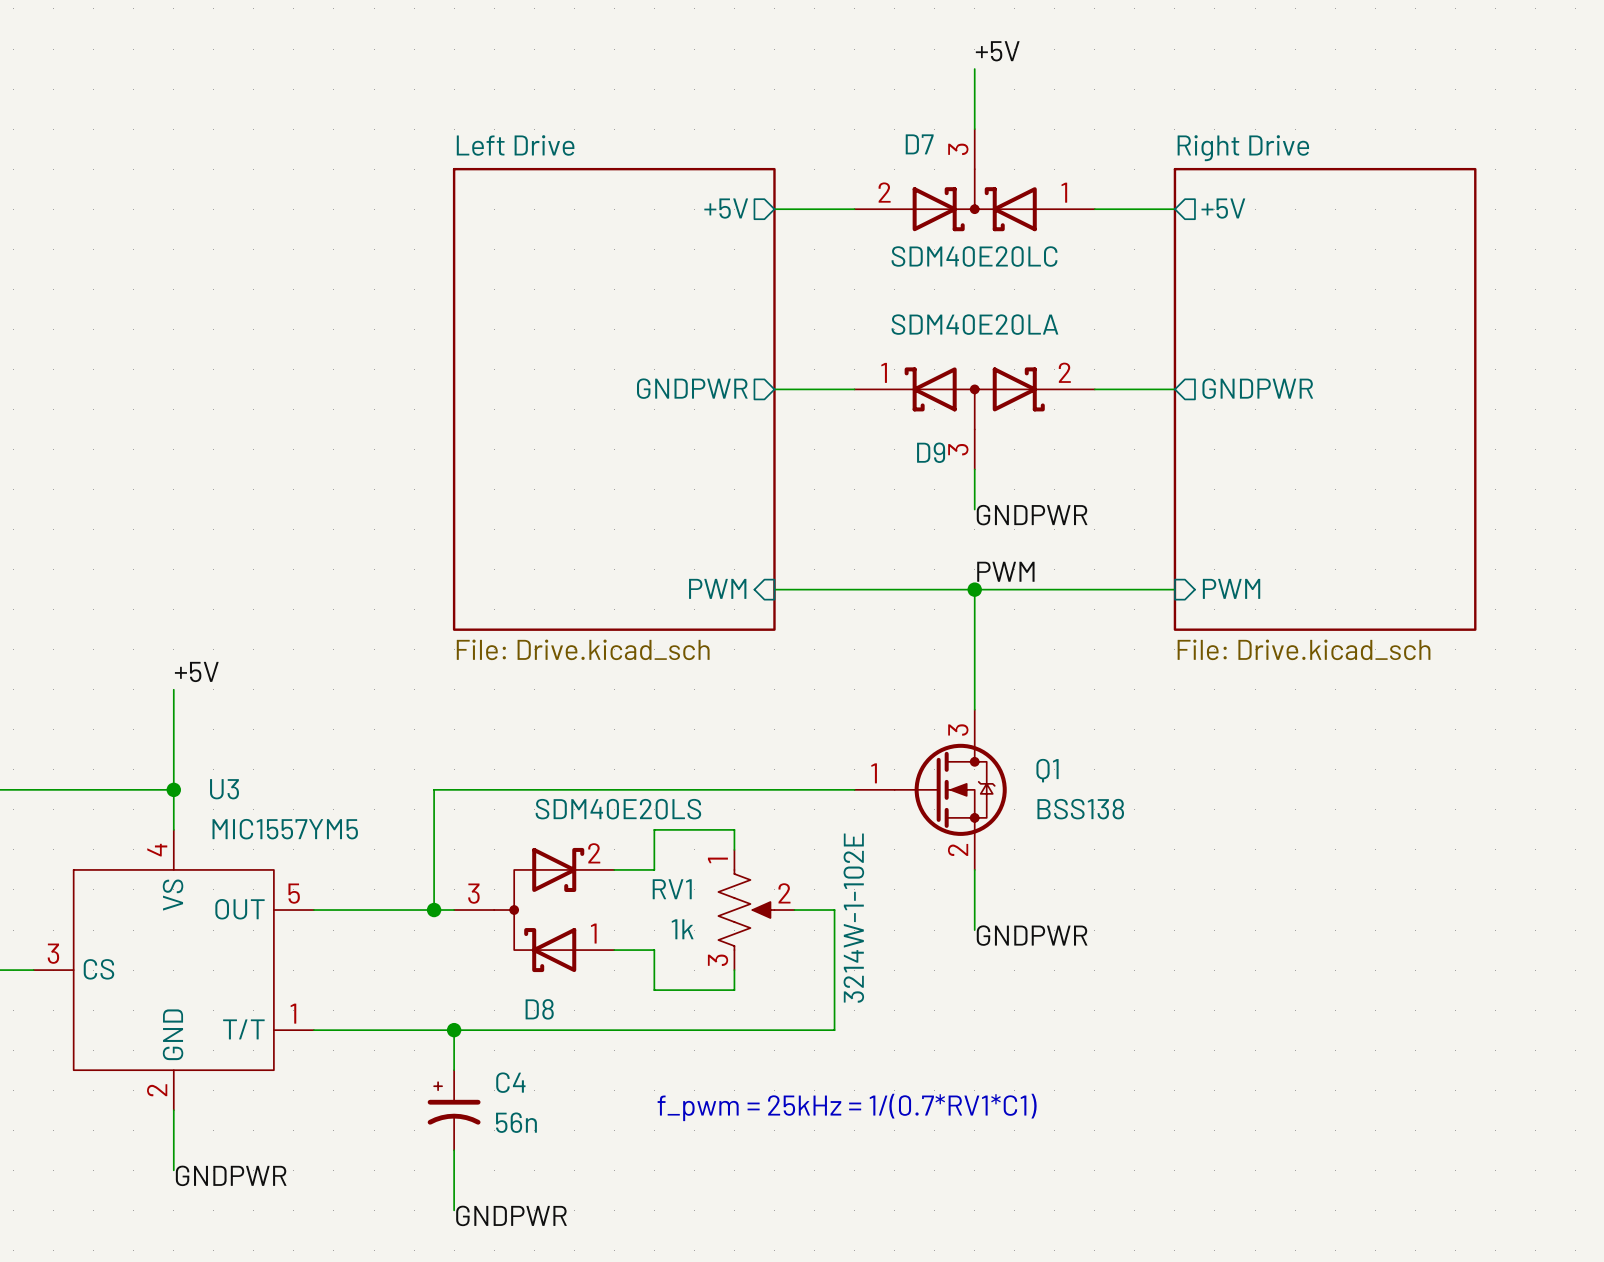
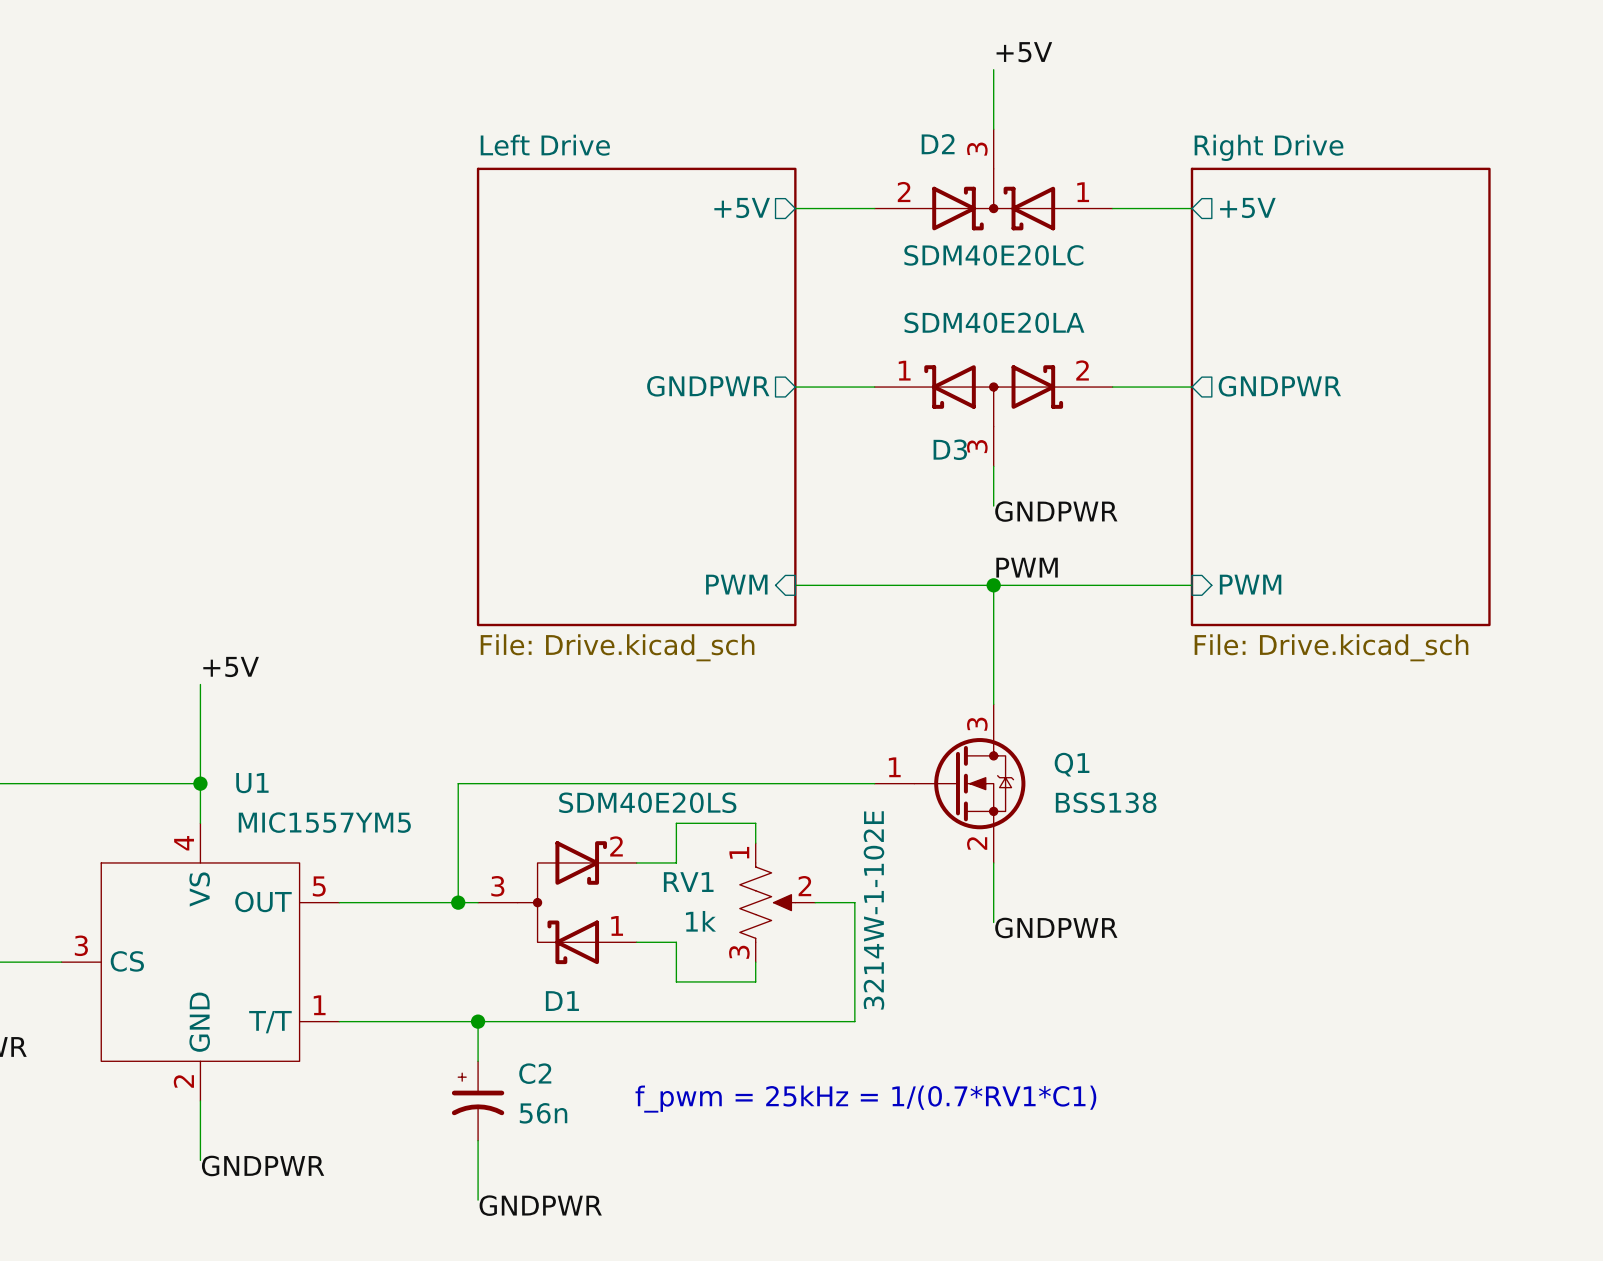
D7 name: D7 (919, 144) -> D2 (938, 144)
D9 name: D9 (931, 452) -> D3 (950, 449)
U3 name: U3 (224, 789) -> U1 (252, 783)
D8 name: D8 (539, 1009) -> D1 (562, 1001)
C4 name: C4 (510, 1082) -> C2 (535, 1073)

